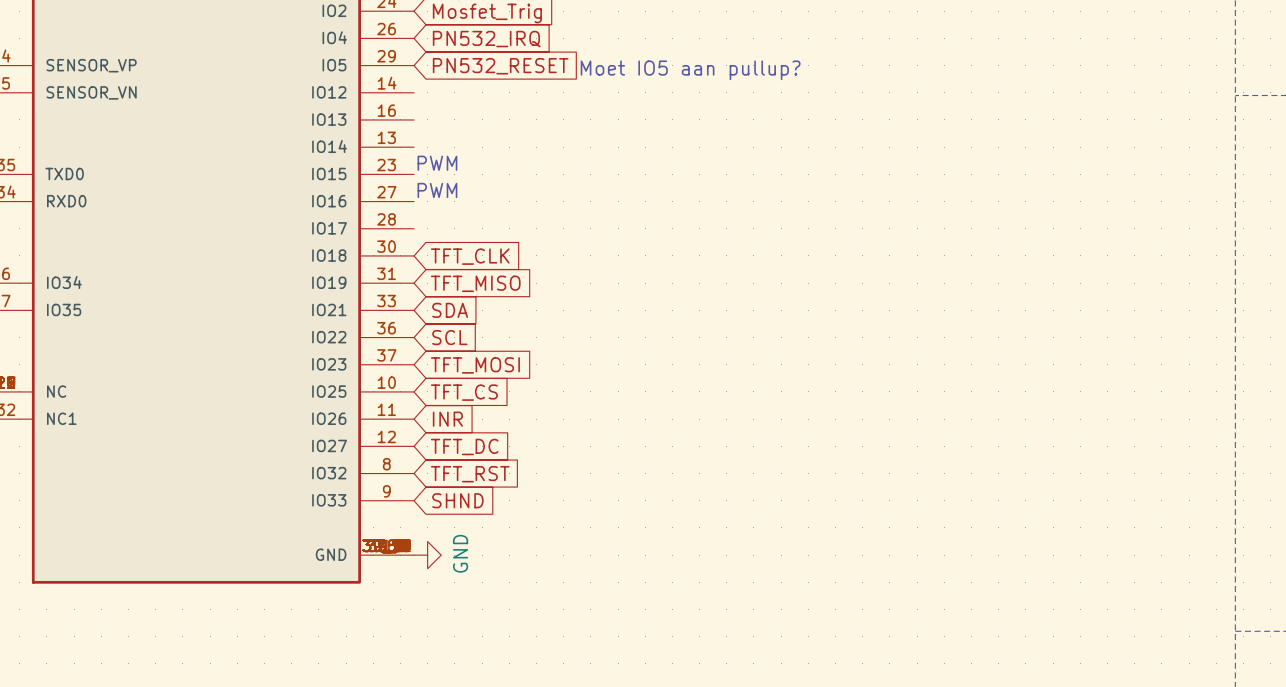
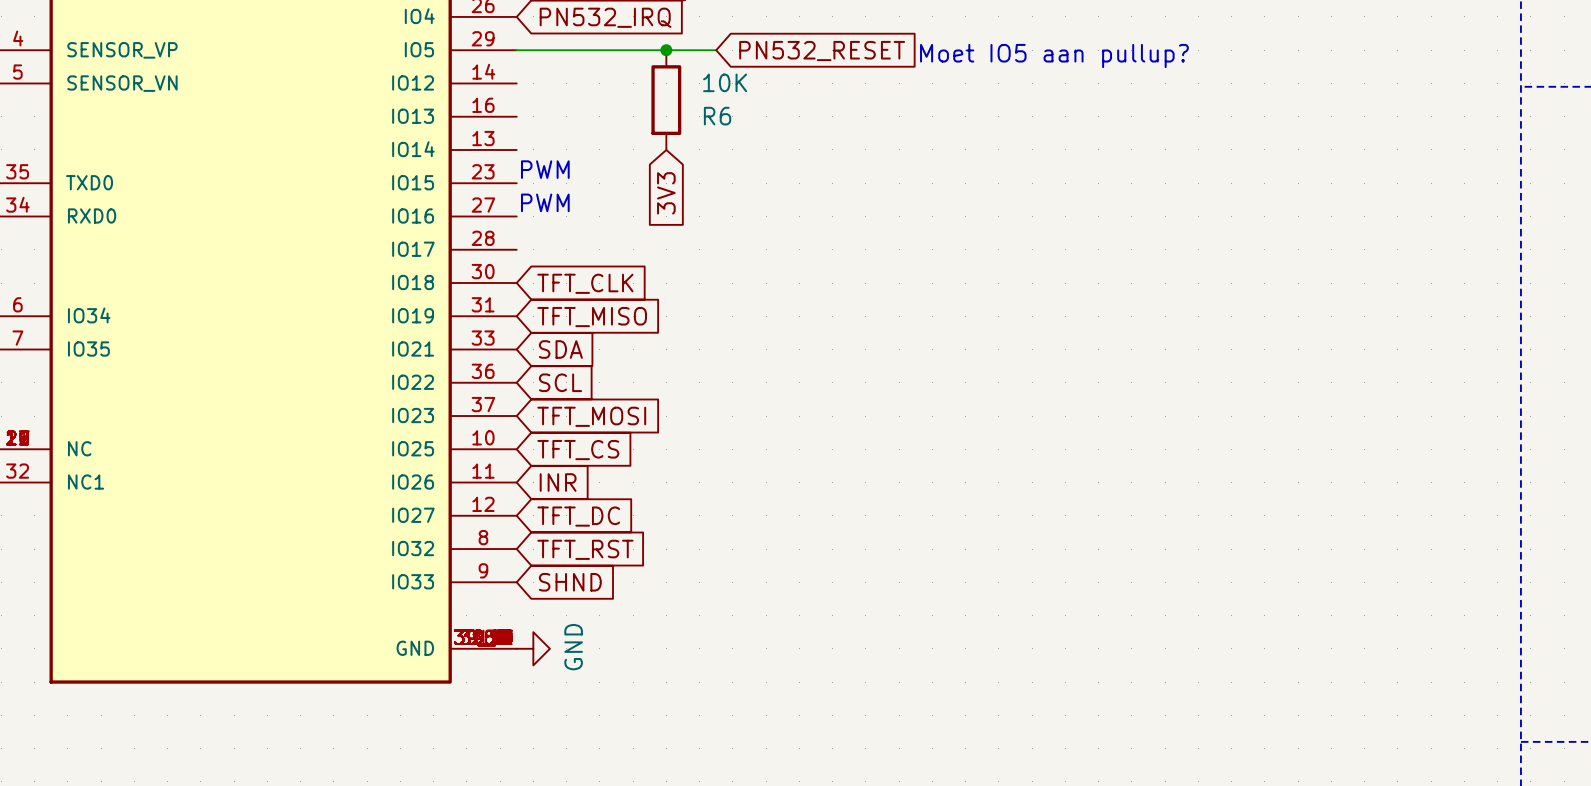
wire: none -> (516, 50) (716, 50)
junction: none -> (666, 50)
global label position: PN532_RESET (500, 66) -> PN532_RESET (822, 51)
text position: Moet IO5 aan pullup? (690, 70) -> Moet IO5 aan pullup? (1054, 56)
R6: none -> 10K (666, 100)
global label: none -> 3V3 (666, 193)

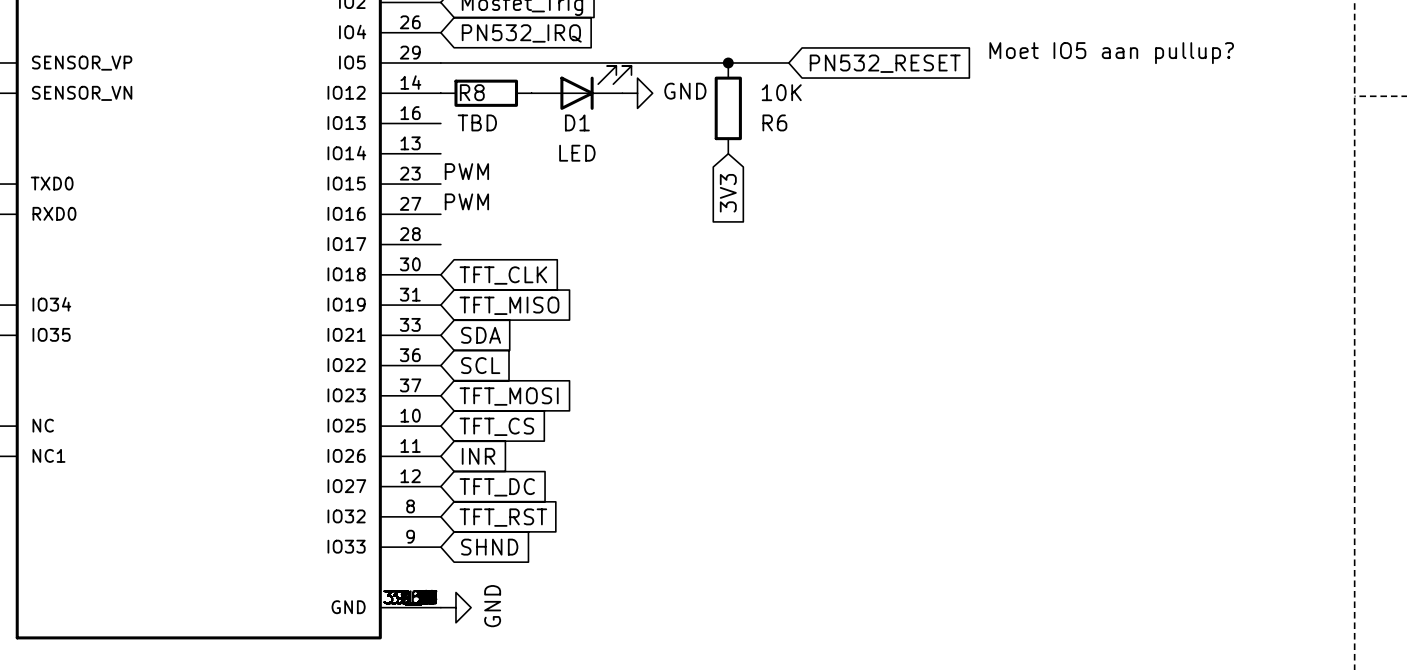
junction: (666, 50) -> none
wire: none -> (622, 62) (788, 62)
junction: none -> (728, 62)
global label position: PN532_RESET (822, 51) -> PN532_RESET (885, 63)
text position: Moet IO5 aan pullup? (1054, 56) -> Moet IO5 aan pullup? (1111, 53)
D1: none -> LED (581, 87)
R8: none -> TBD (486, 93)
power symbol: none -> GND (637, 93)
R6 position: (666, 100) -> (728, 108)
global label position: 3V3 (666, 193) -> 3V3 (728, 193)

